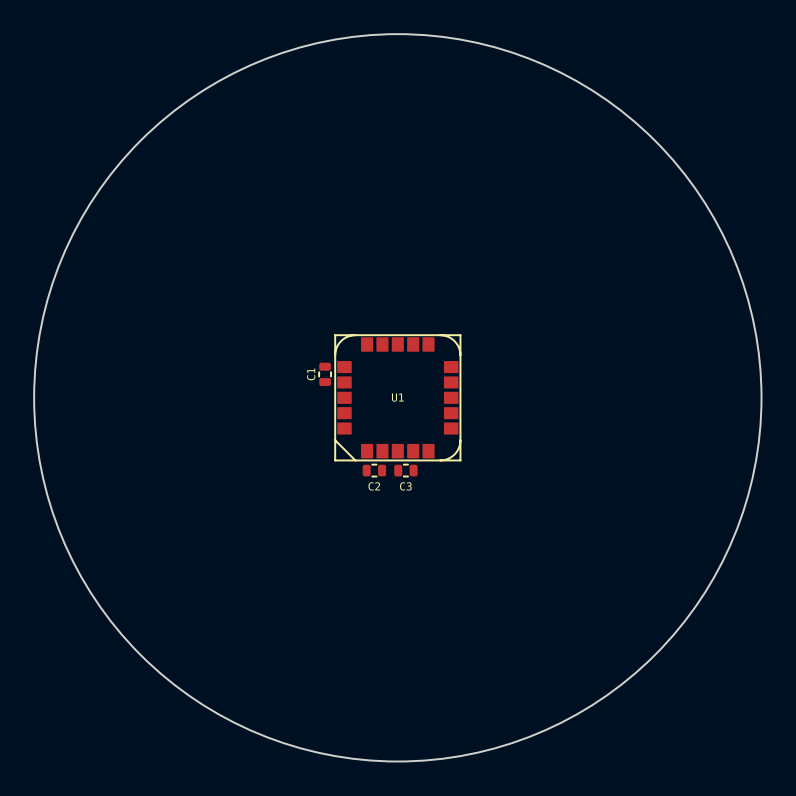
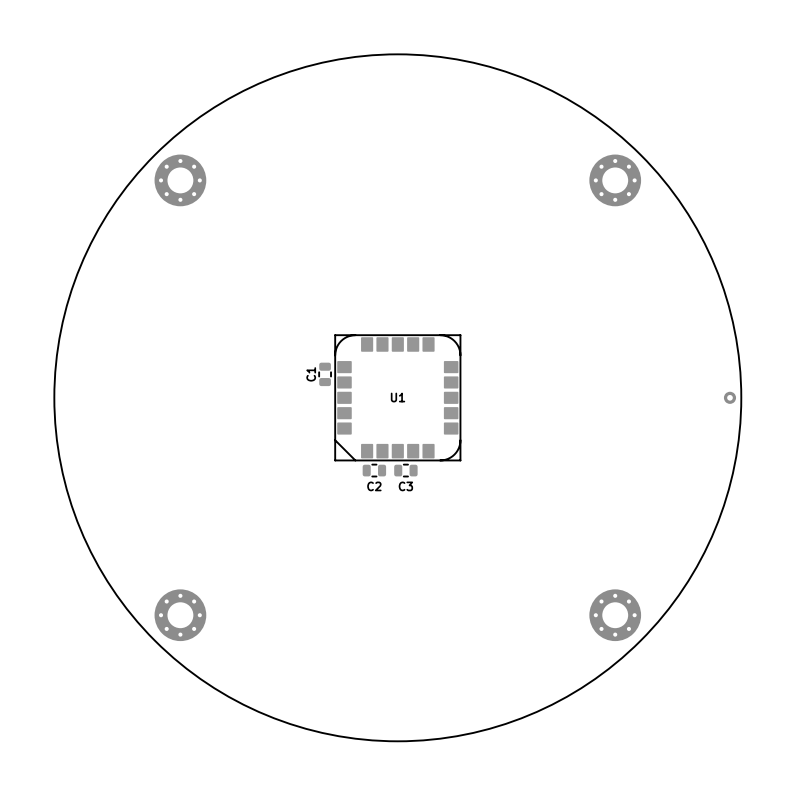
round board edge size: [33, 33, 762, 762] -> [54, 54, 742, 742]
part: none -> (180, 180)
part: none -> (615, 180)
part: none -> (729, 397)
part: none -> (180, 615)
part: none -> (615, 615)

